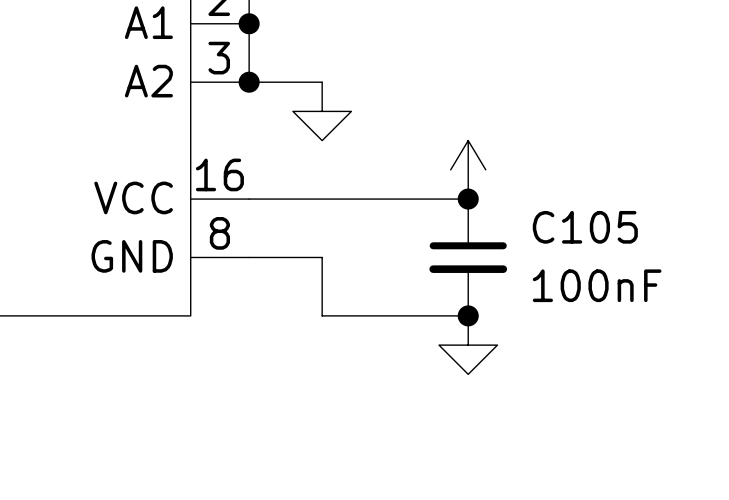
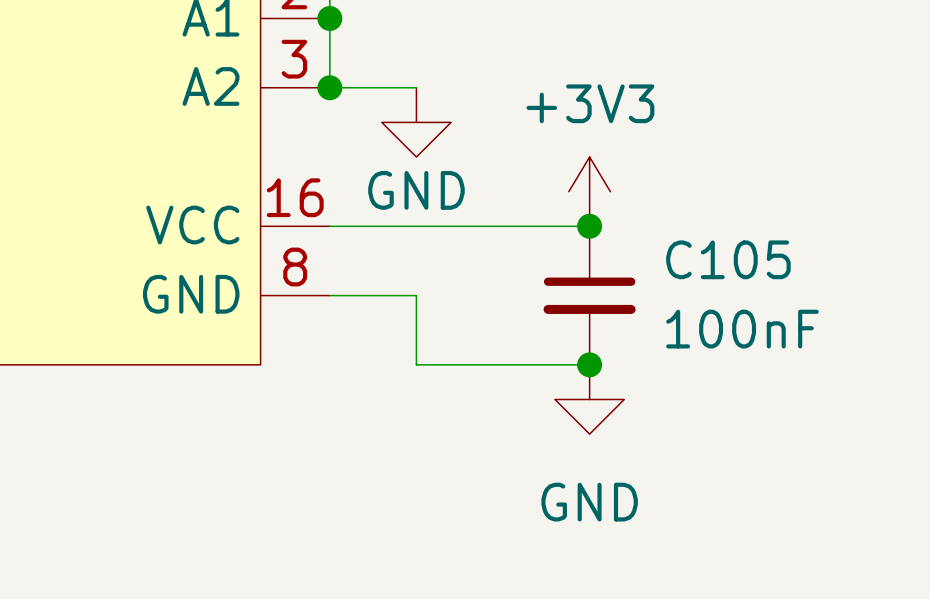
power symbol text: none -> +3V3 (590, 103)
power symbol text: none -> GND (416, 190)
power symbol text: none -> GND (589, 502)

